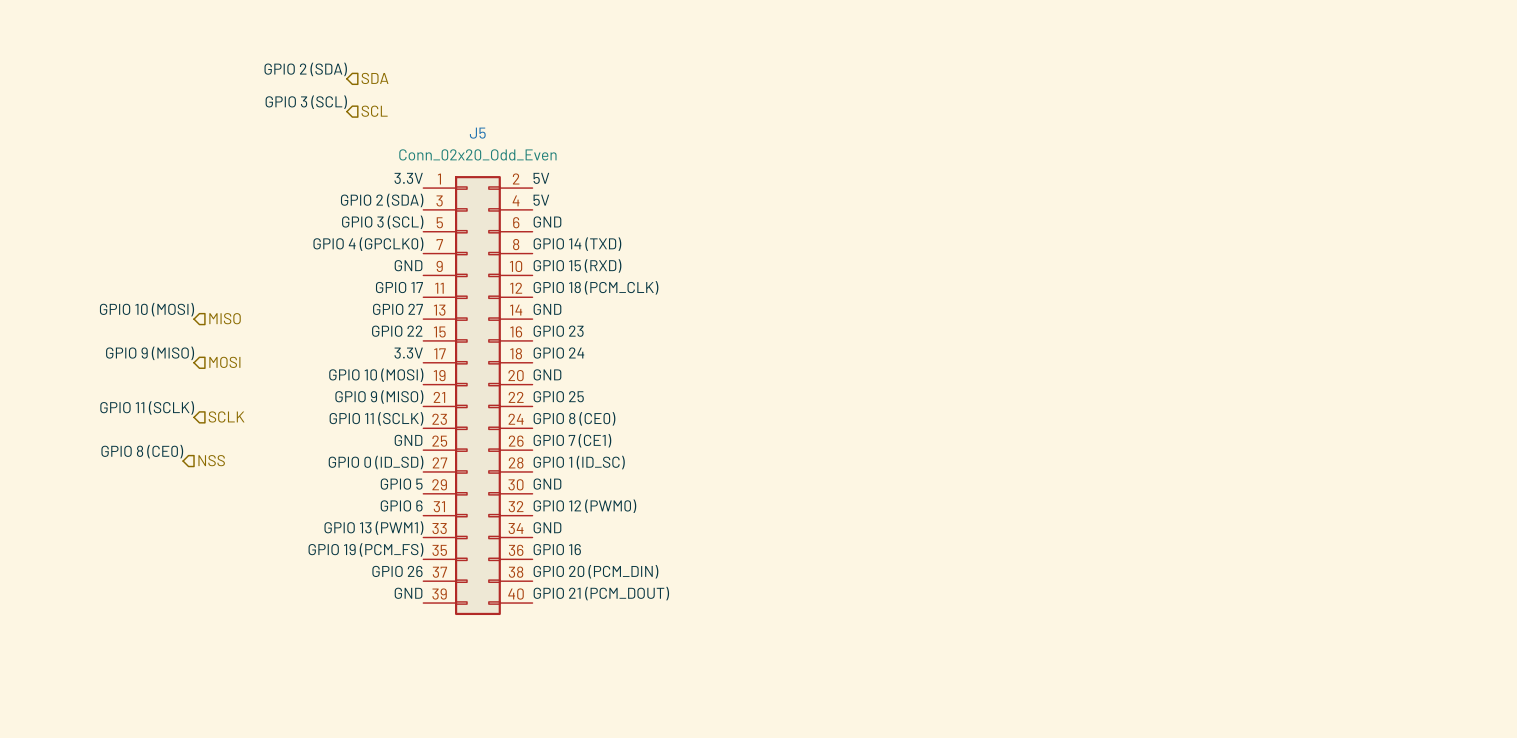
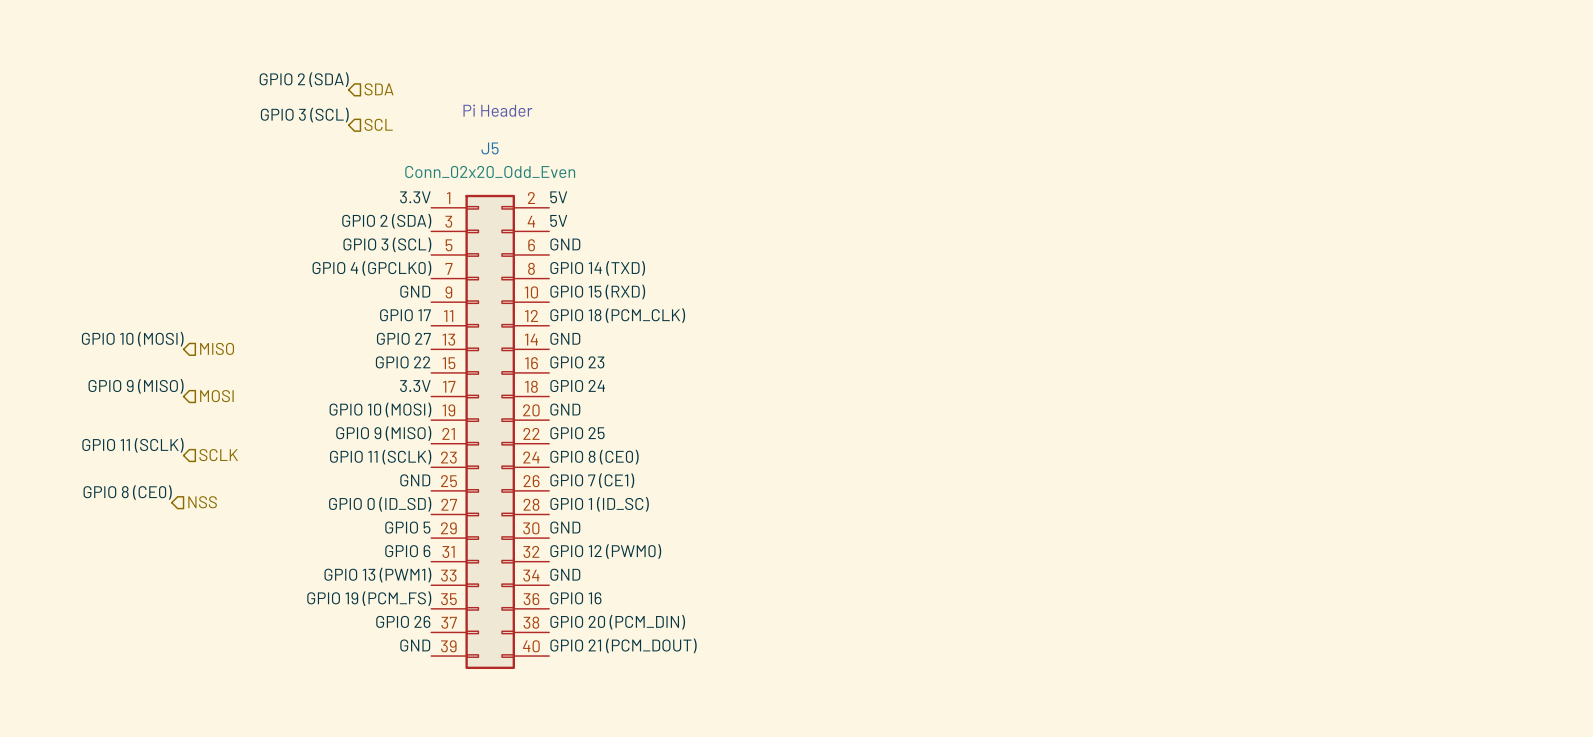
text: none -> Pi Header (497, 110)

